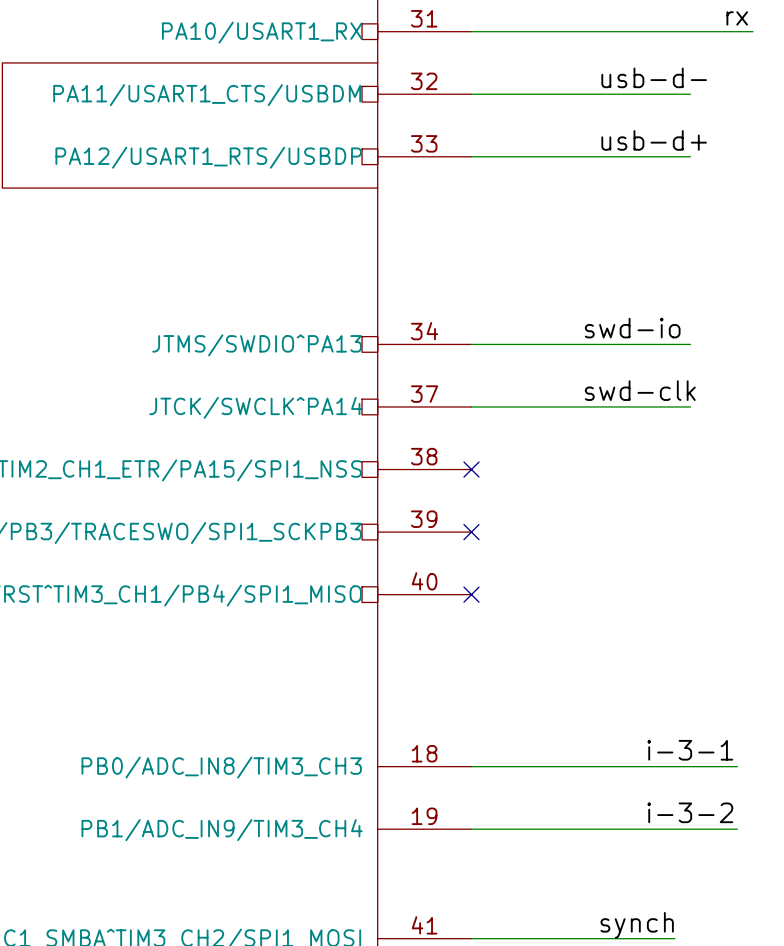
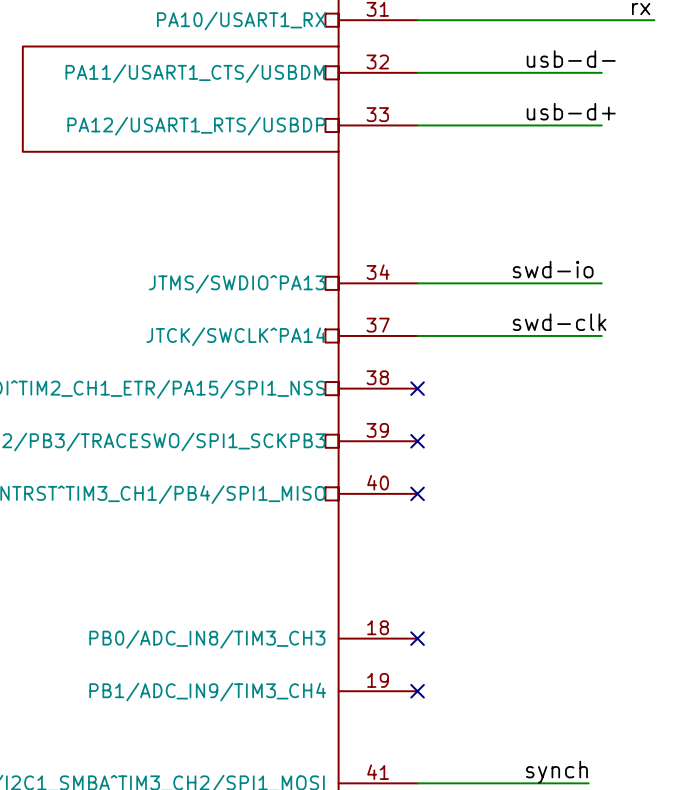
label: i-3-1 (690, 750) -> none
wire: (471, 766) (737, 766) -> none
no-connect mark: none -> (417, 638)
label: i-3-2 (690, 812) -> none
wire: (471, 829) (737, 829) -> none
no-connect mark: none -> (417, 691)

